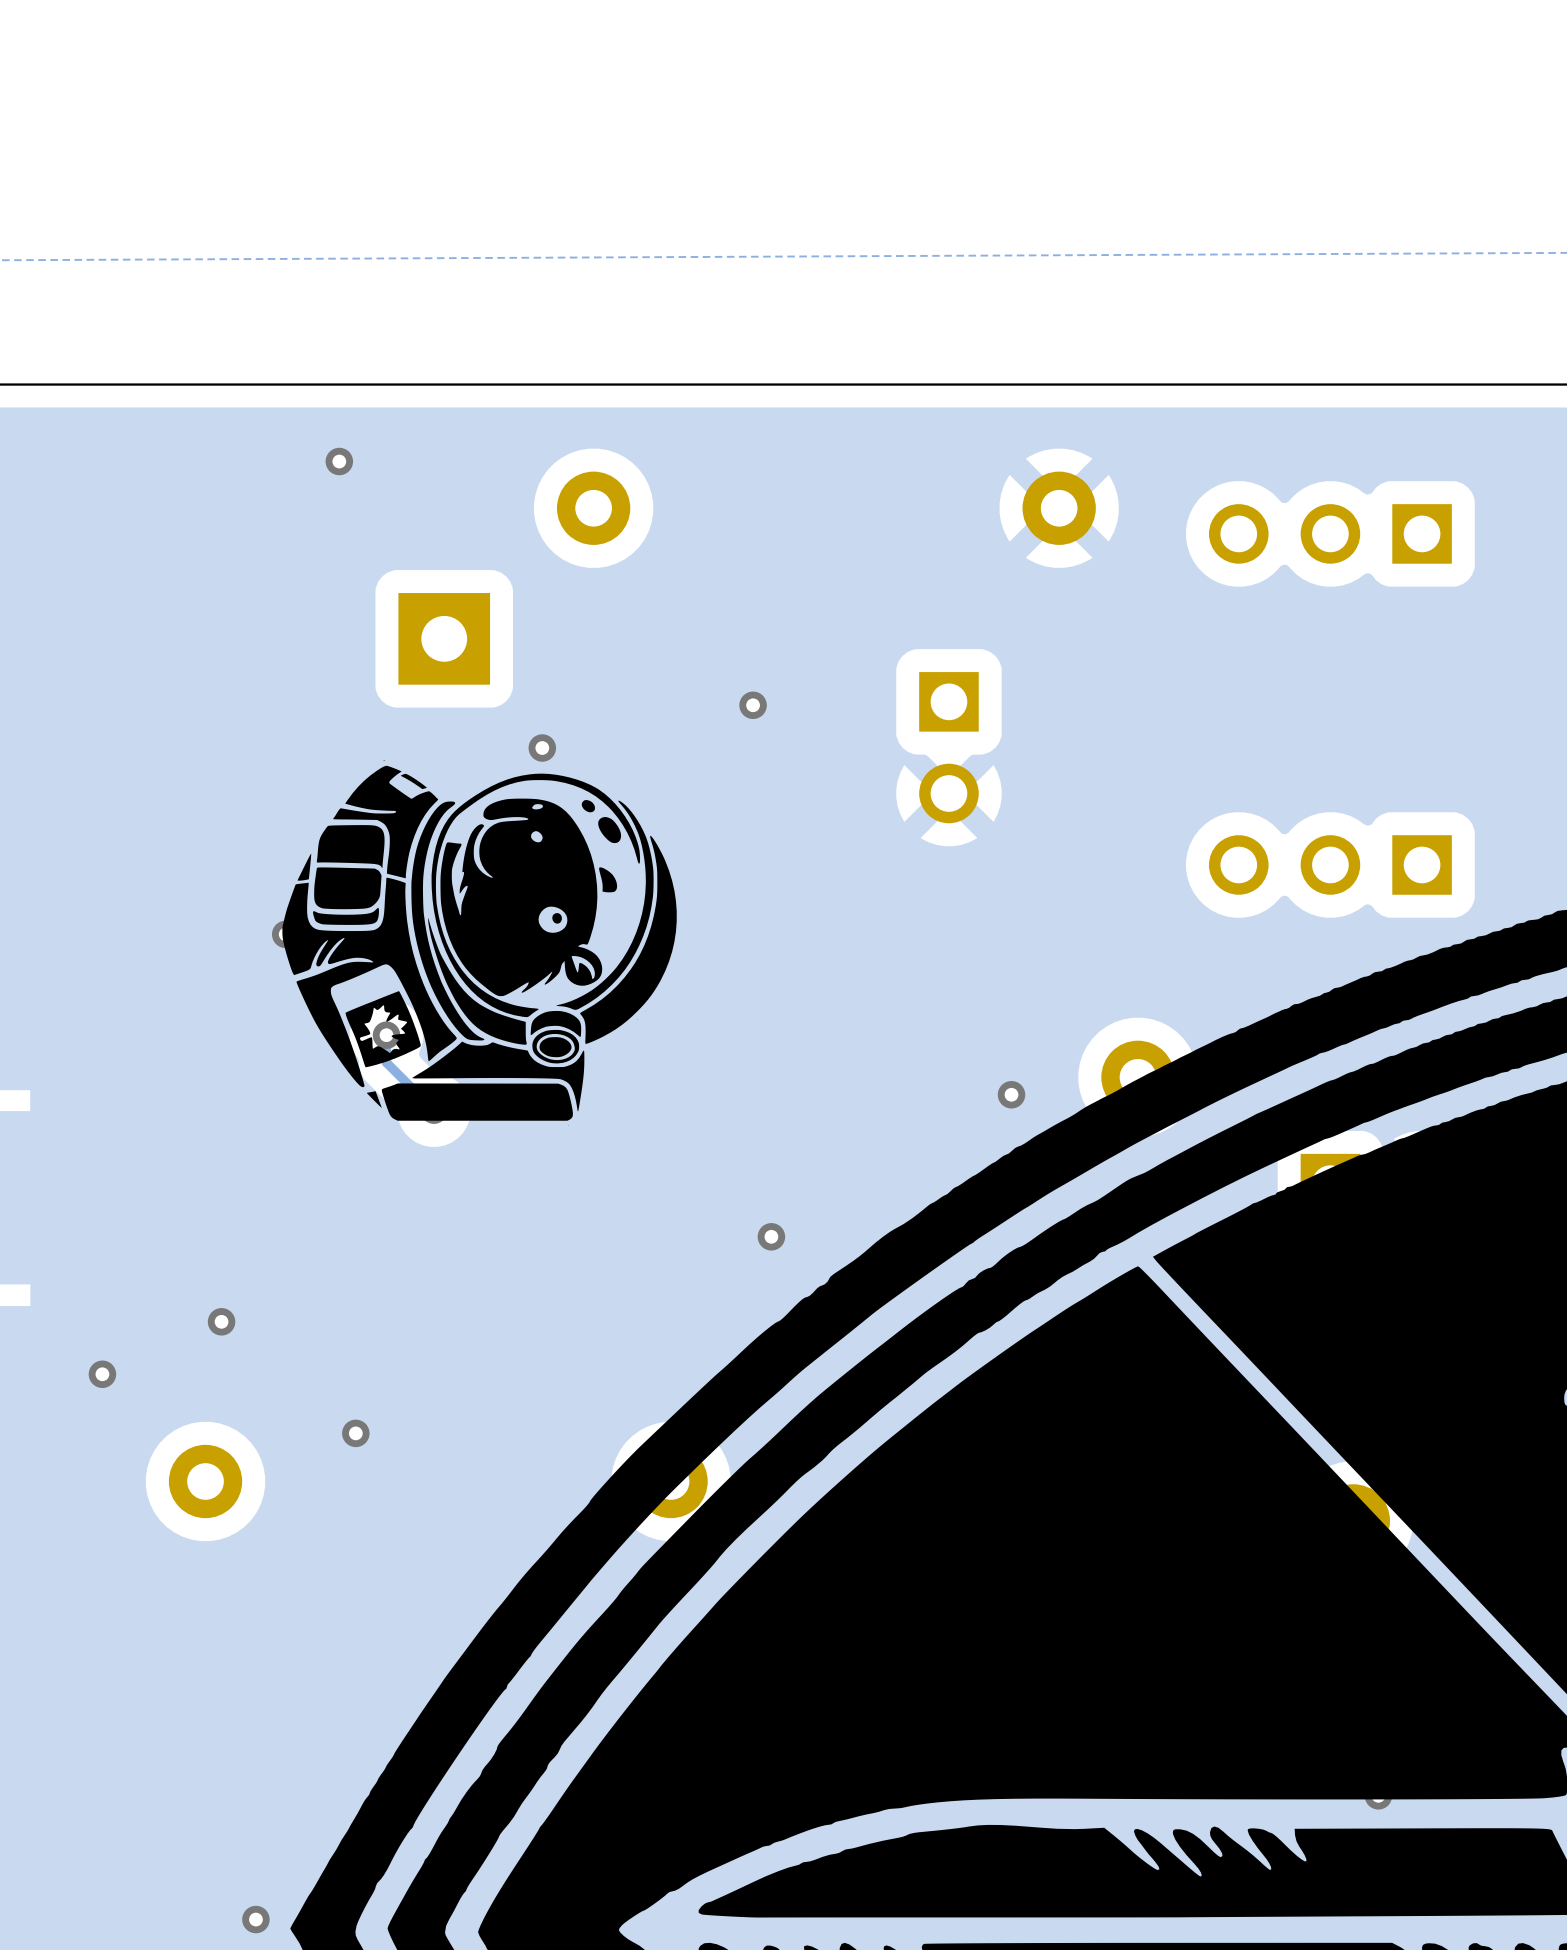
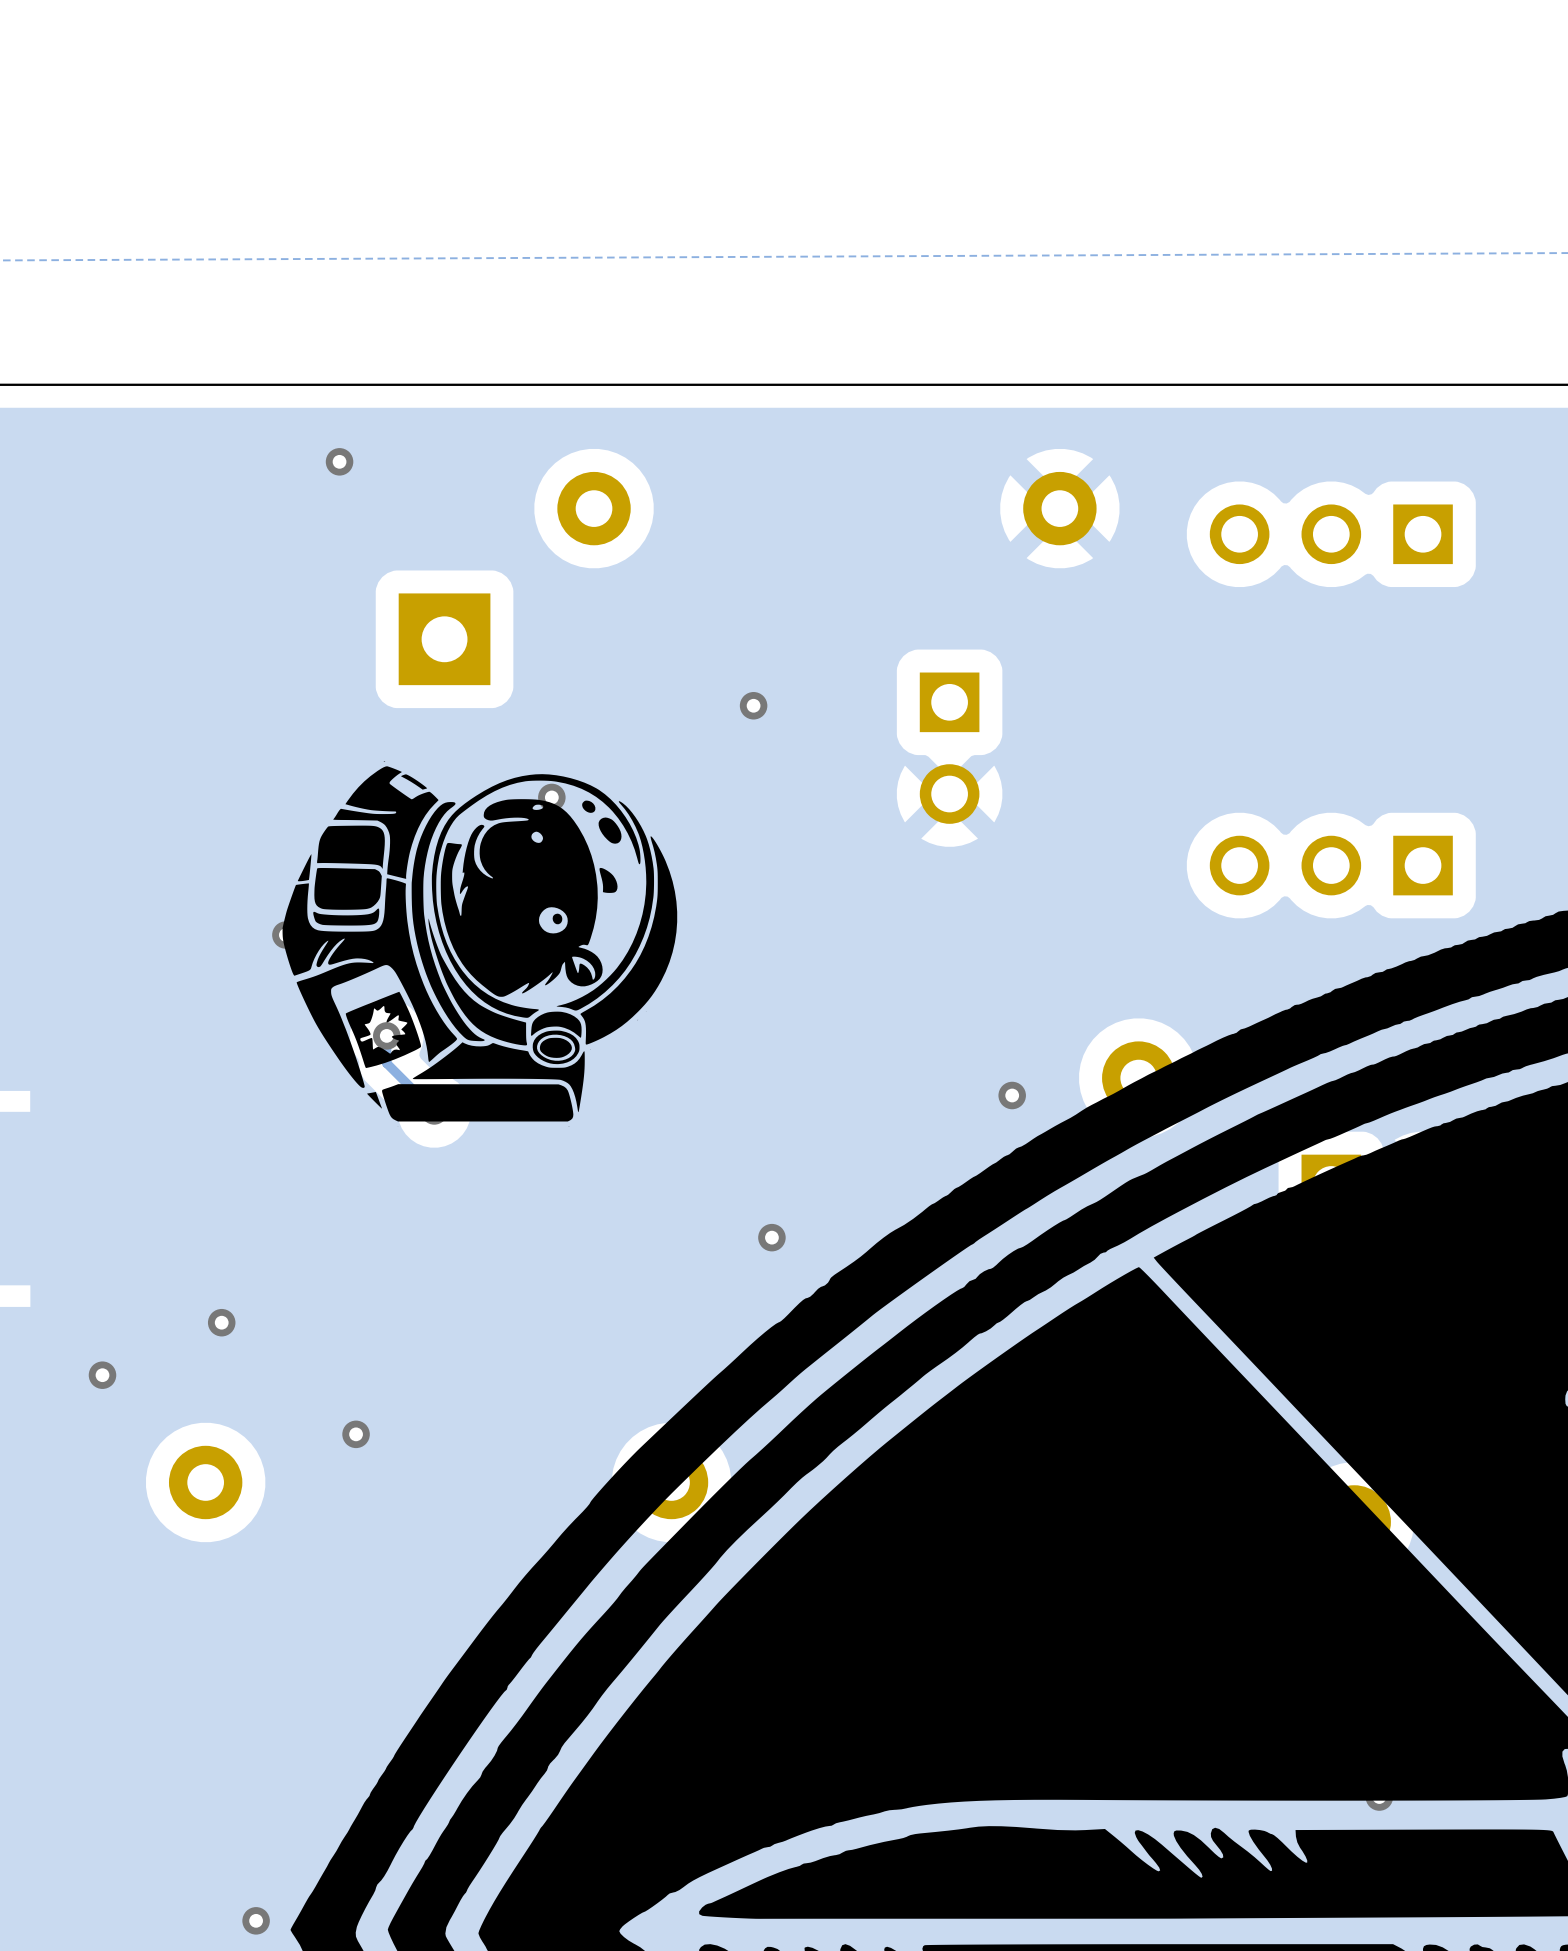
via position: (542, 748) -> (551, 797)

